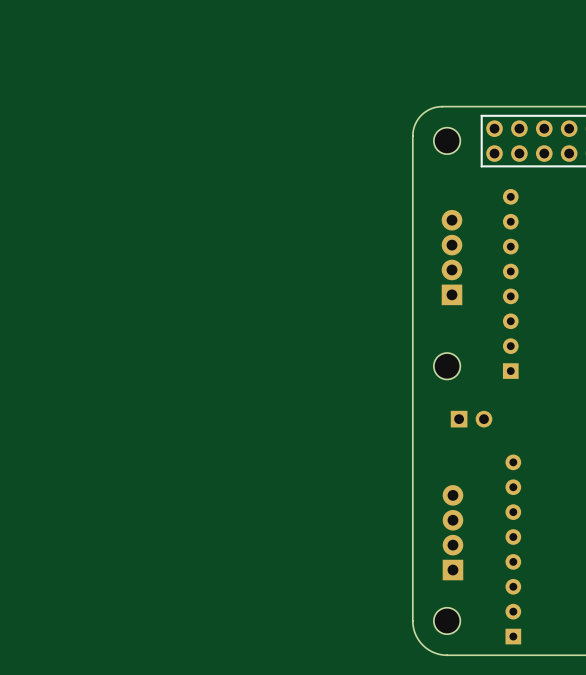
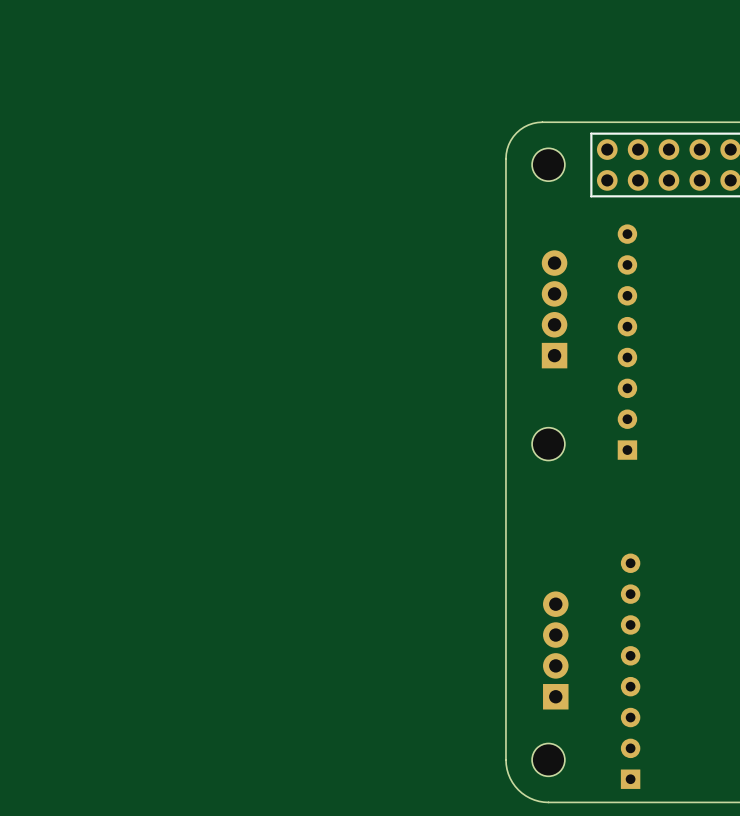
part: (471, 419) -> none

